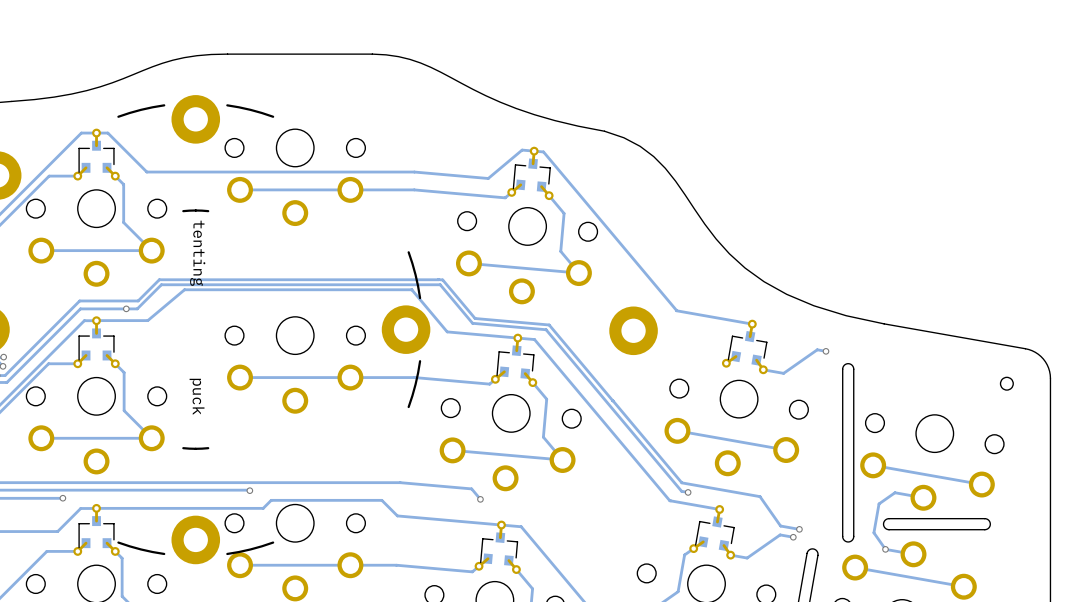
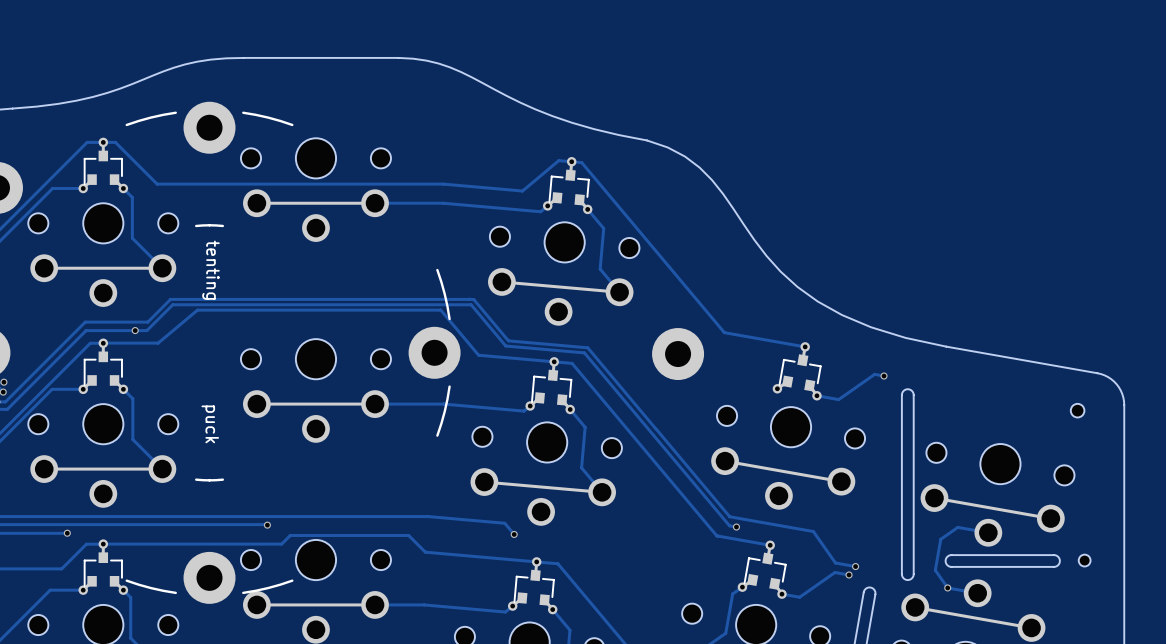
part: none -> (1084, 560)

